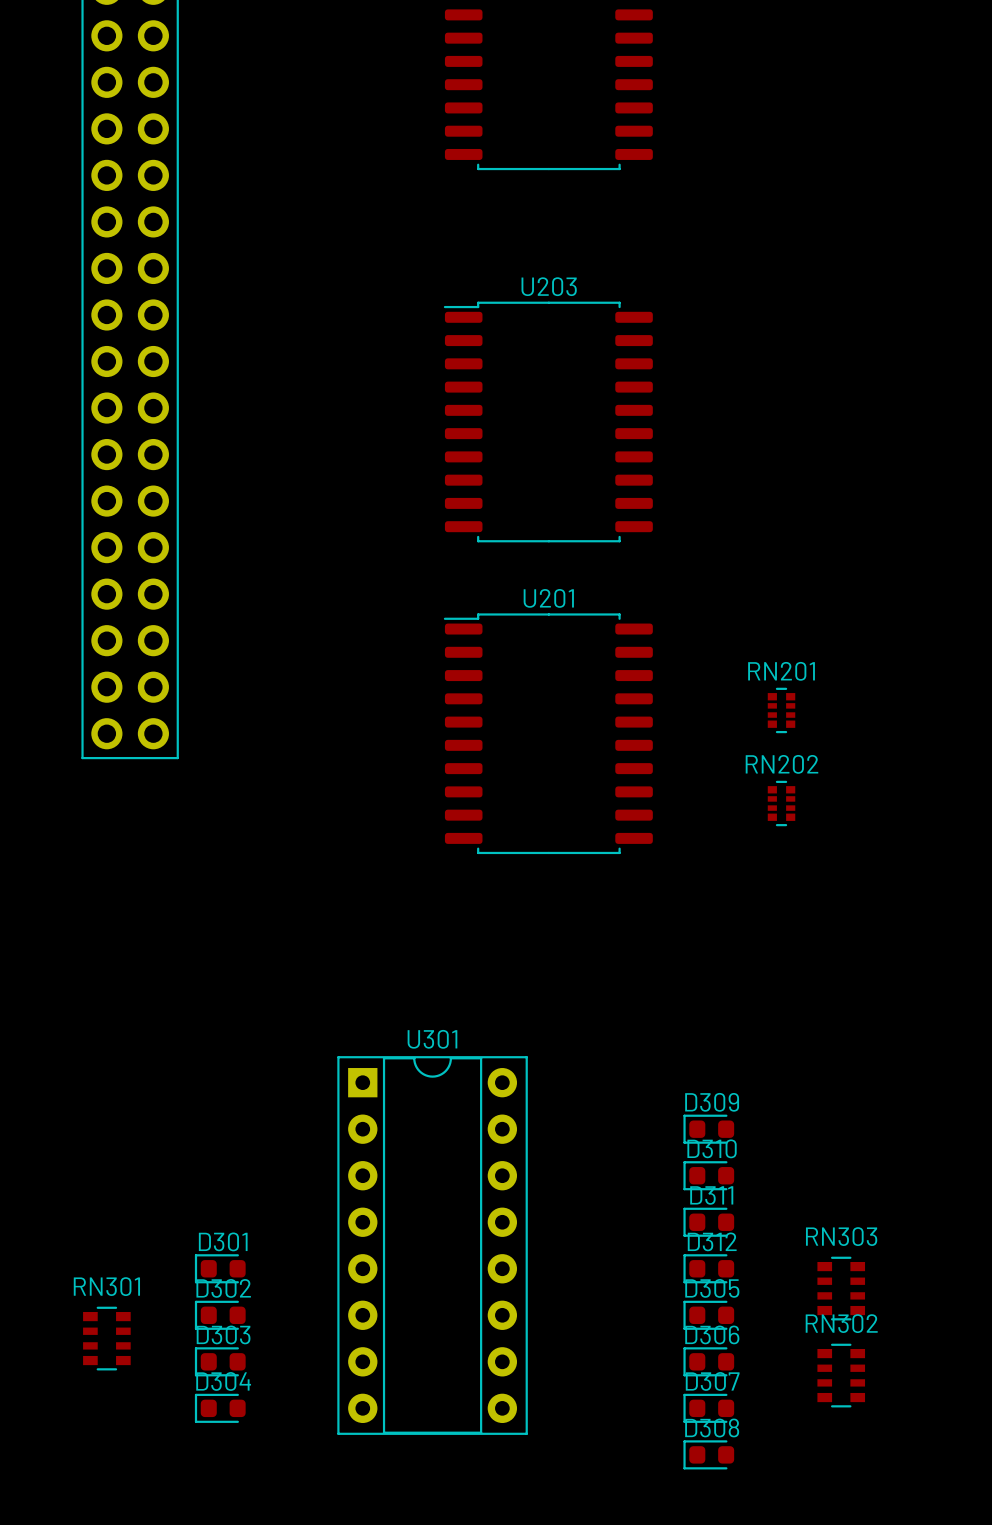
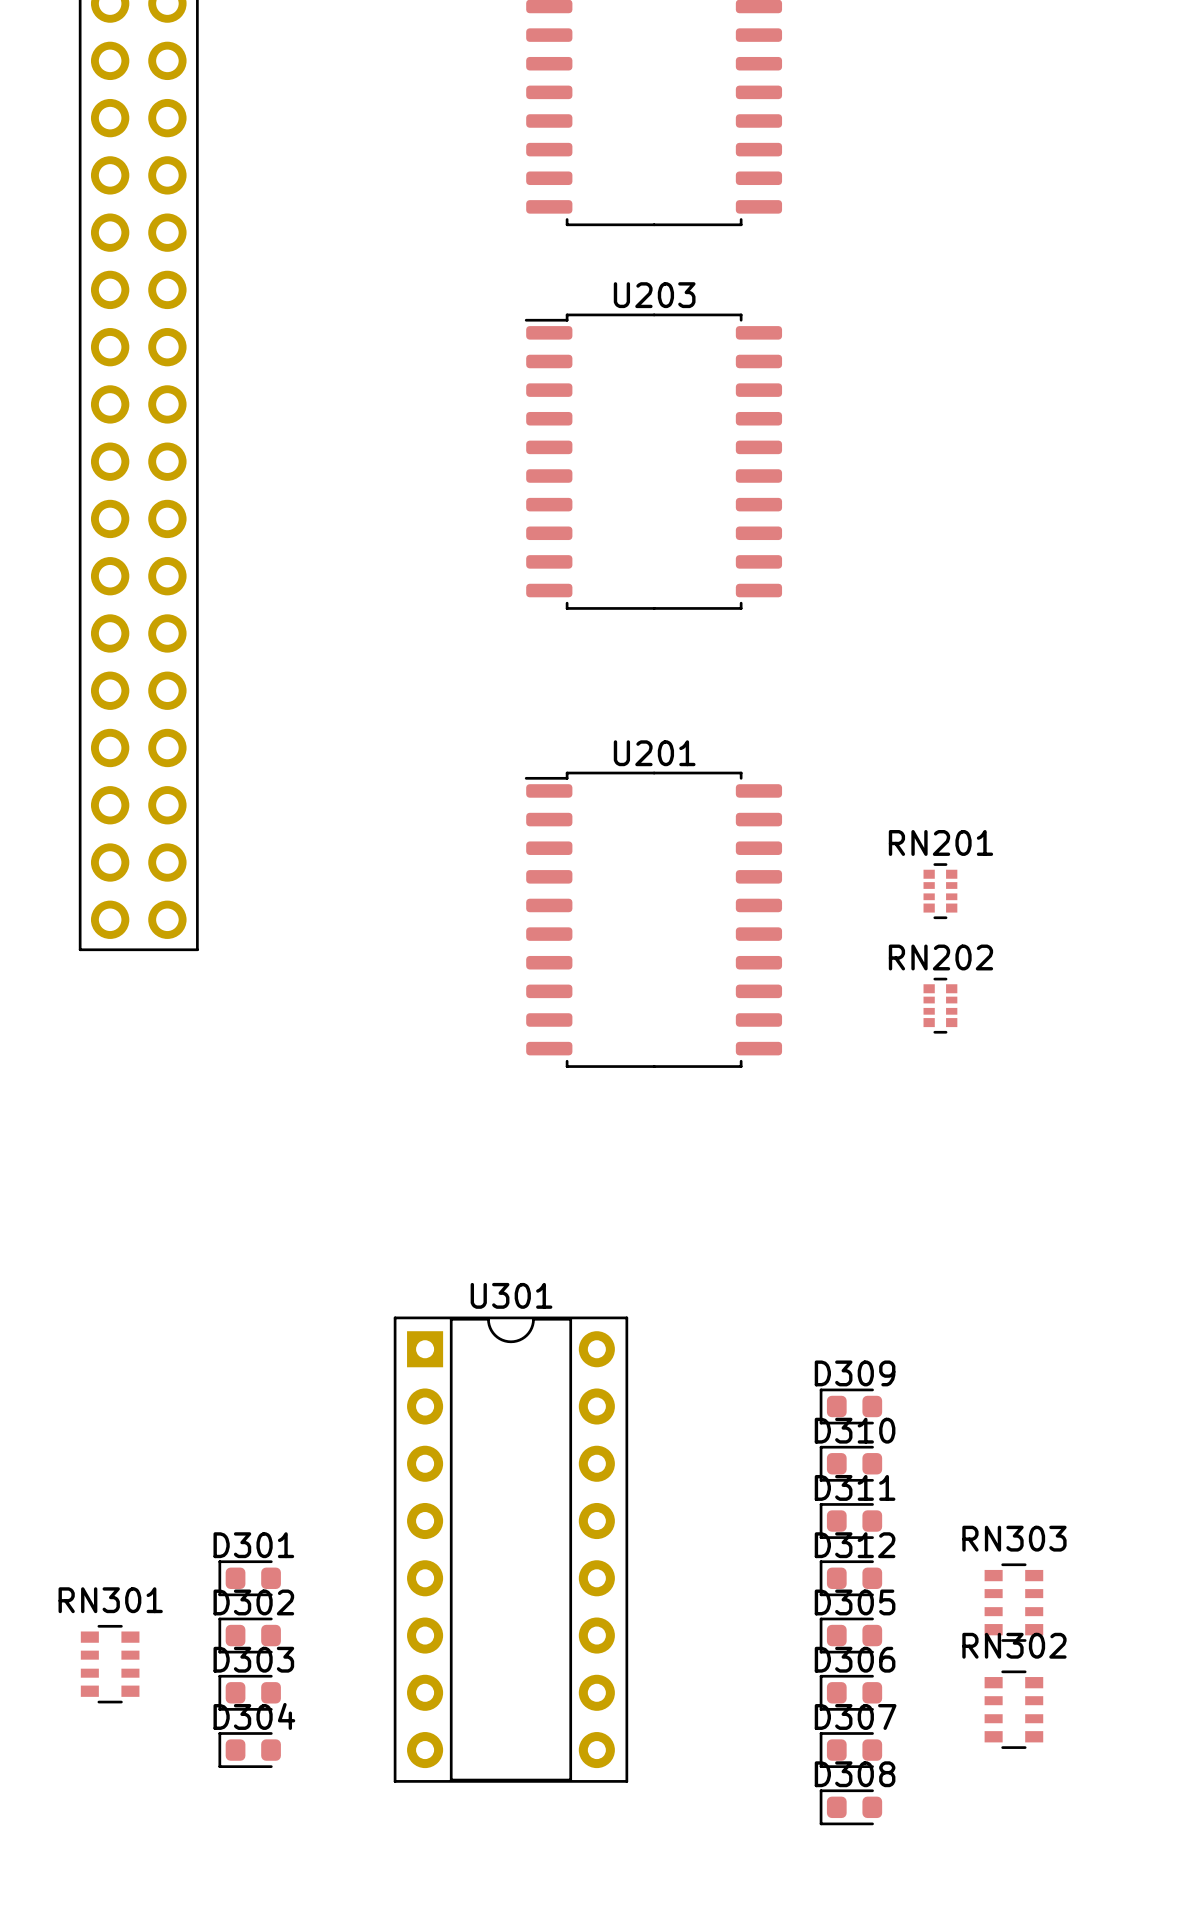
U203 position: (548, 421) -> (653, 461)

